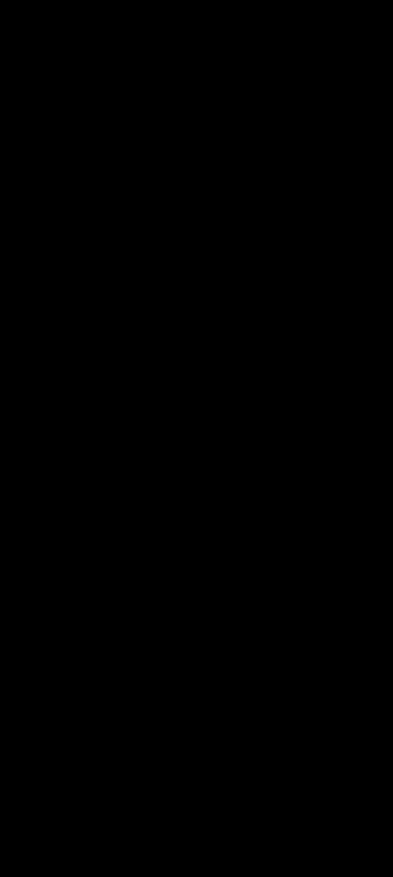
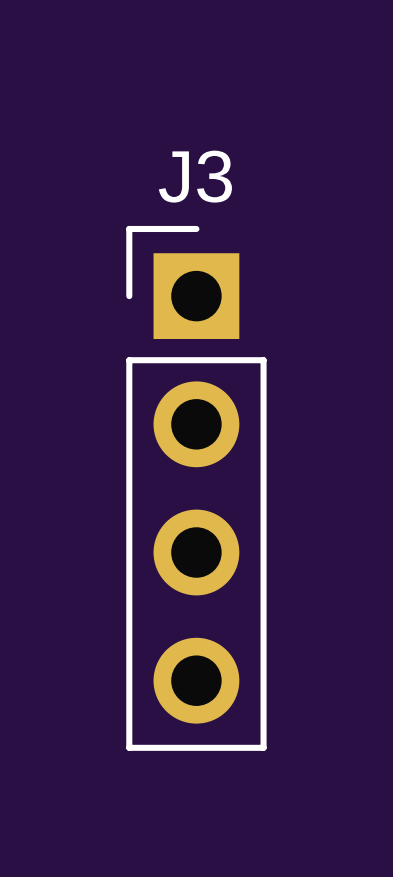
J3: none -> (196, 488)

